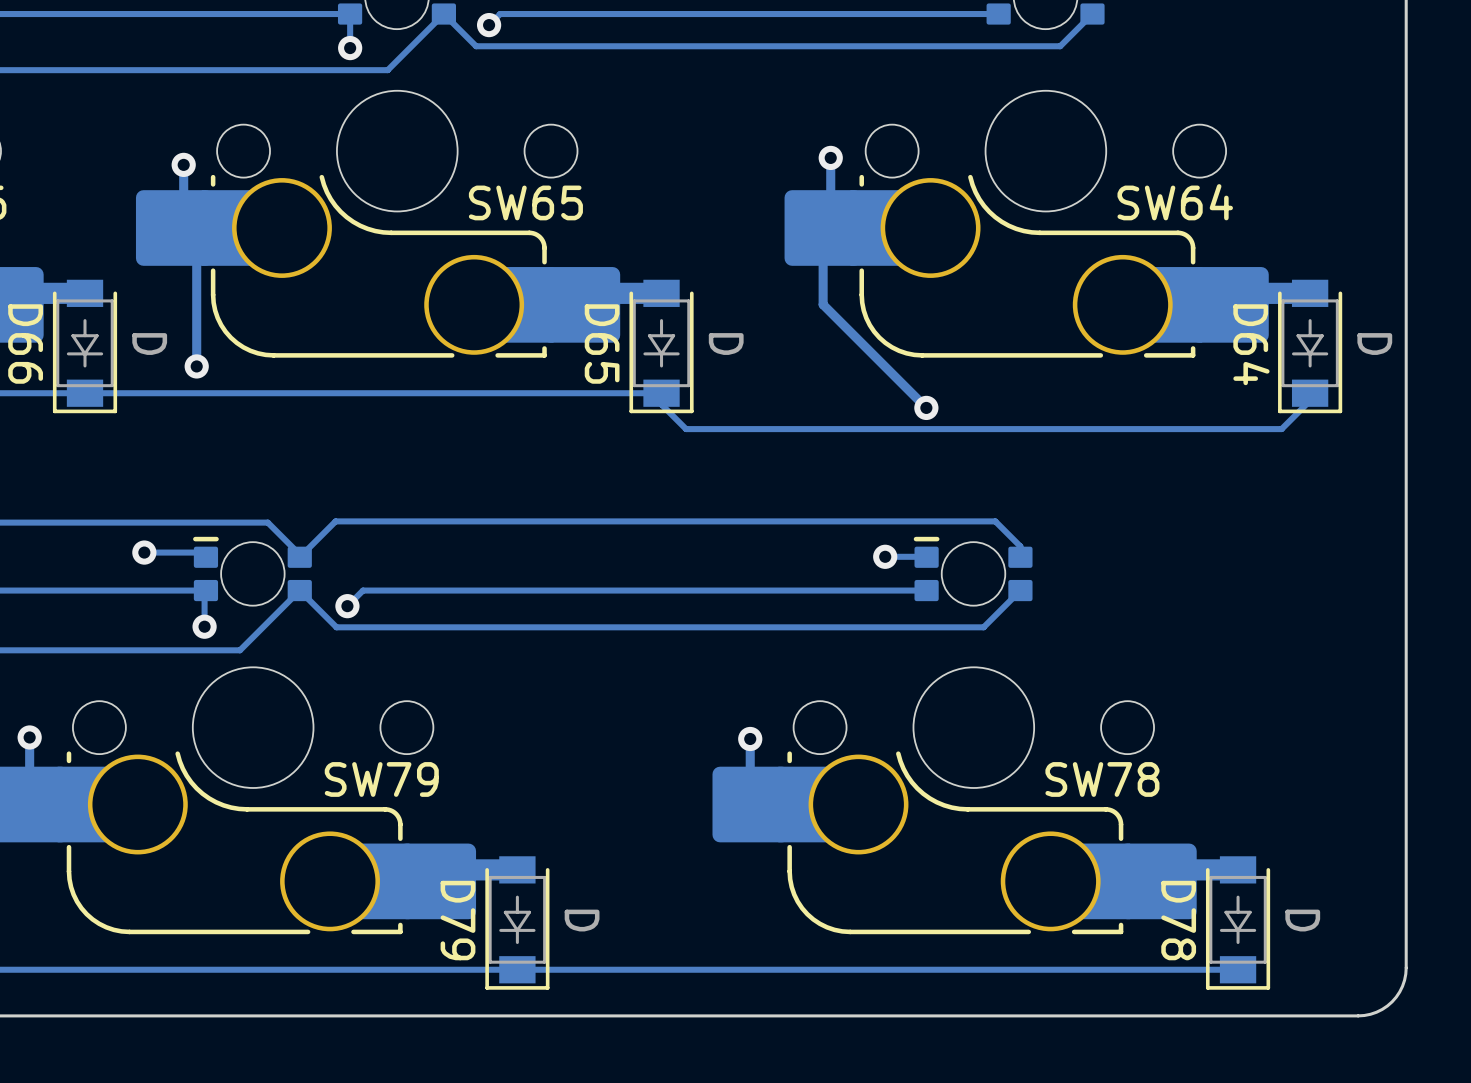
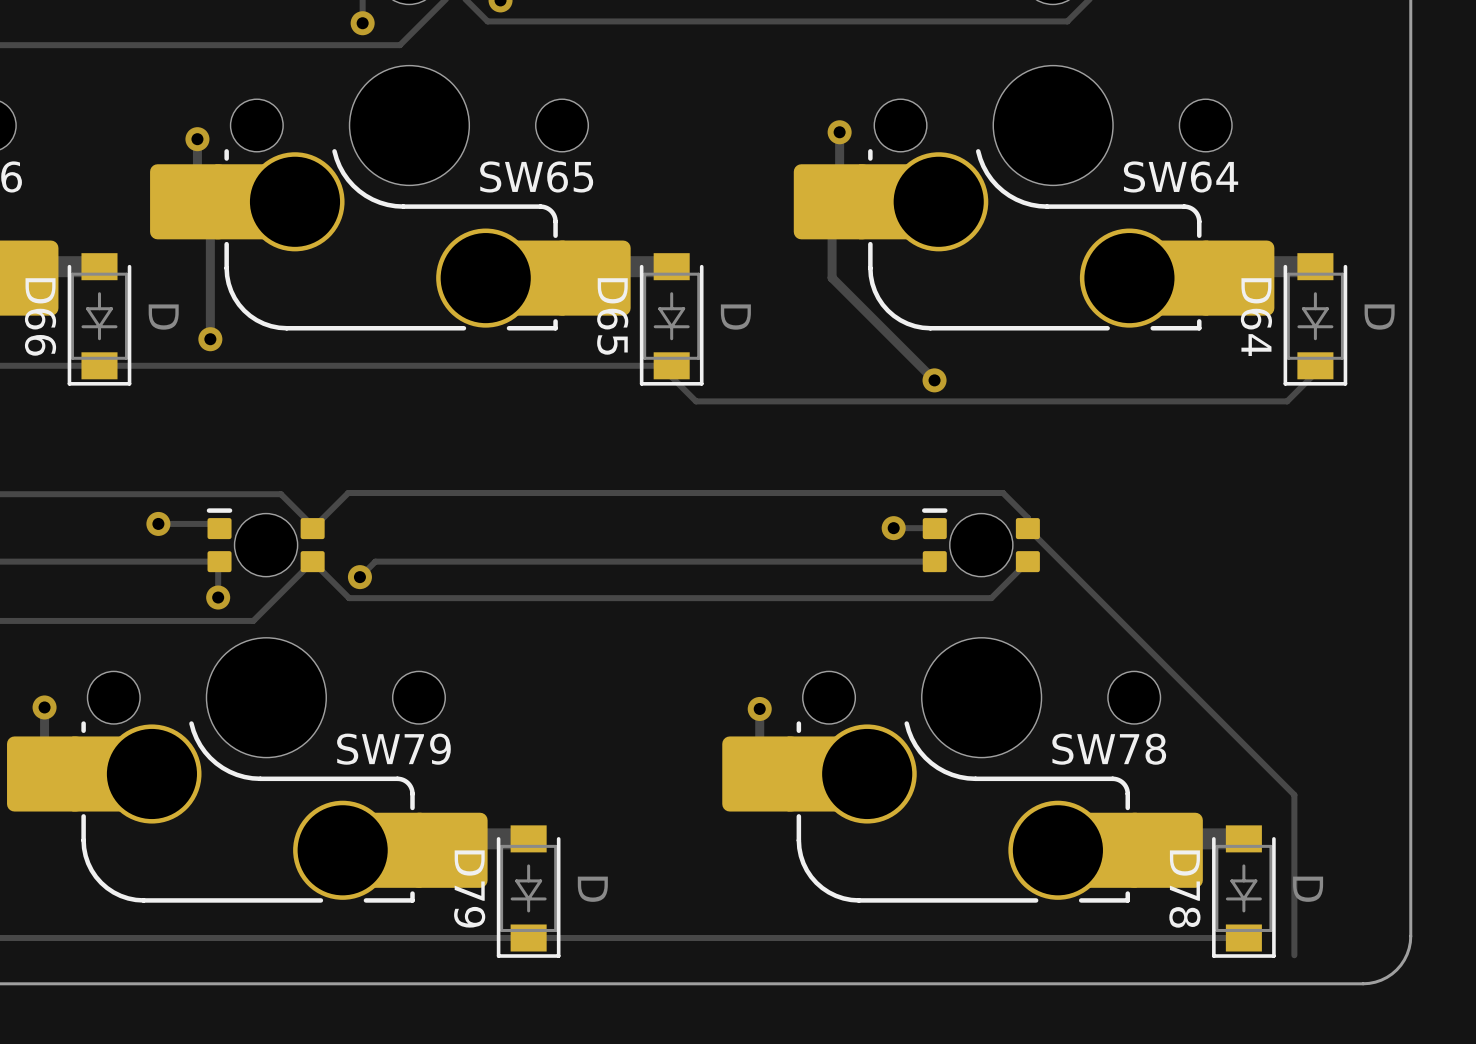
track: none -> (1028, 528) (1294, 794) (1294, 955)

